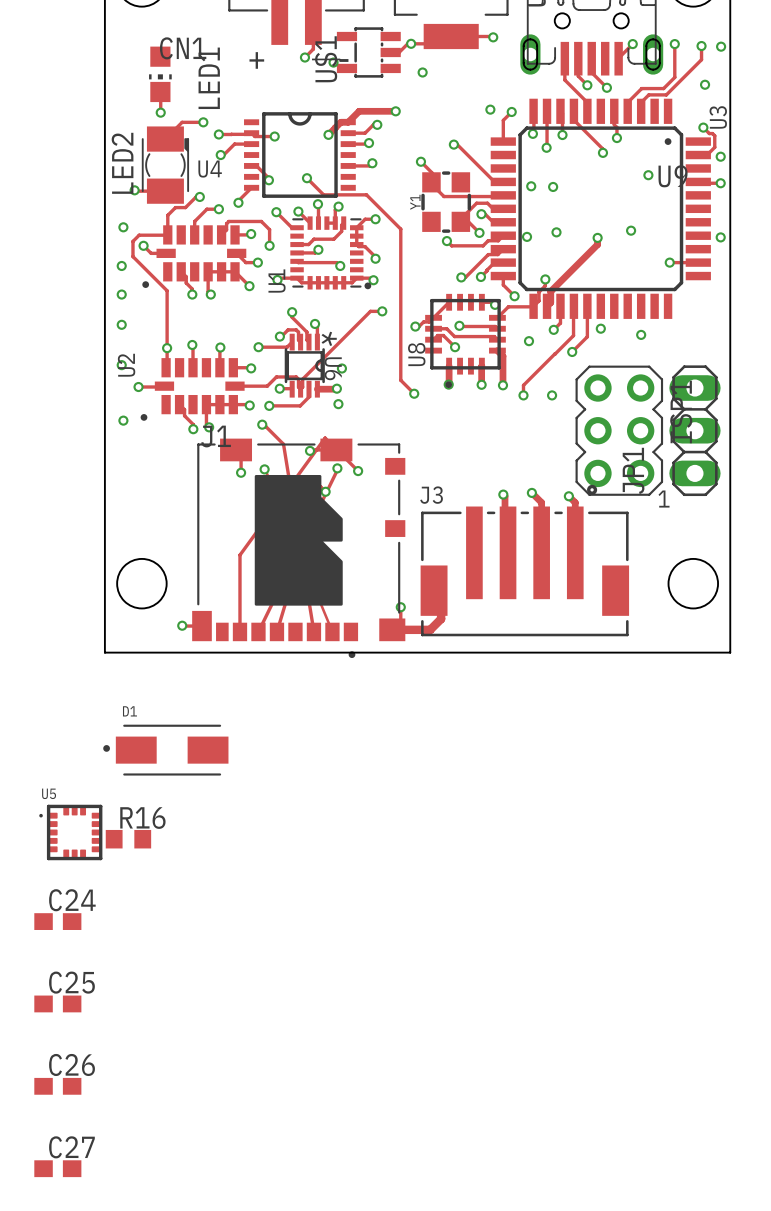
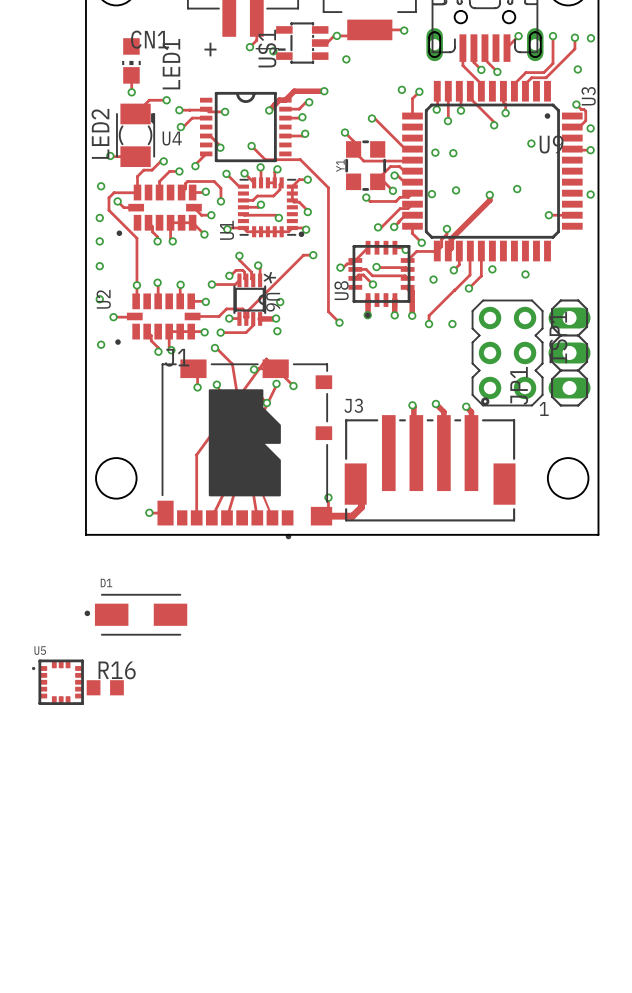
C24: (57, 921) -> none
C25: (57, 1003) -> none
C26: (57, 1086) -> none
C27: (57, 1168) -> none

